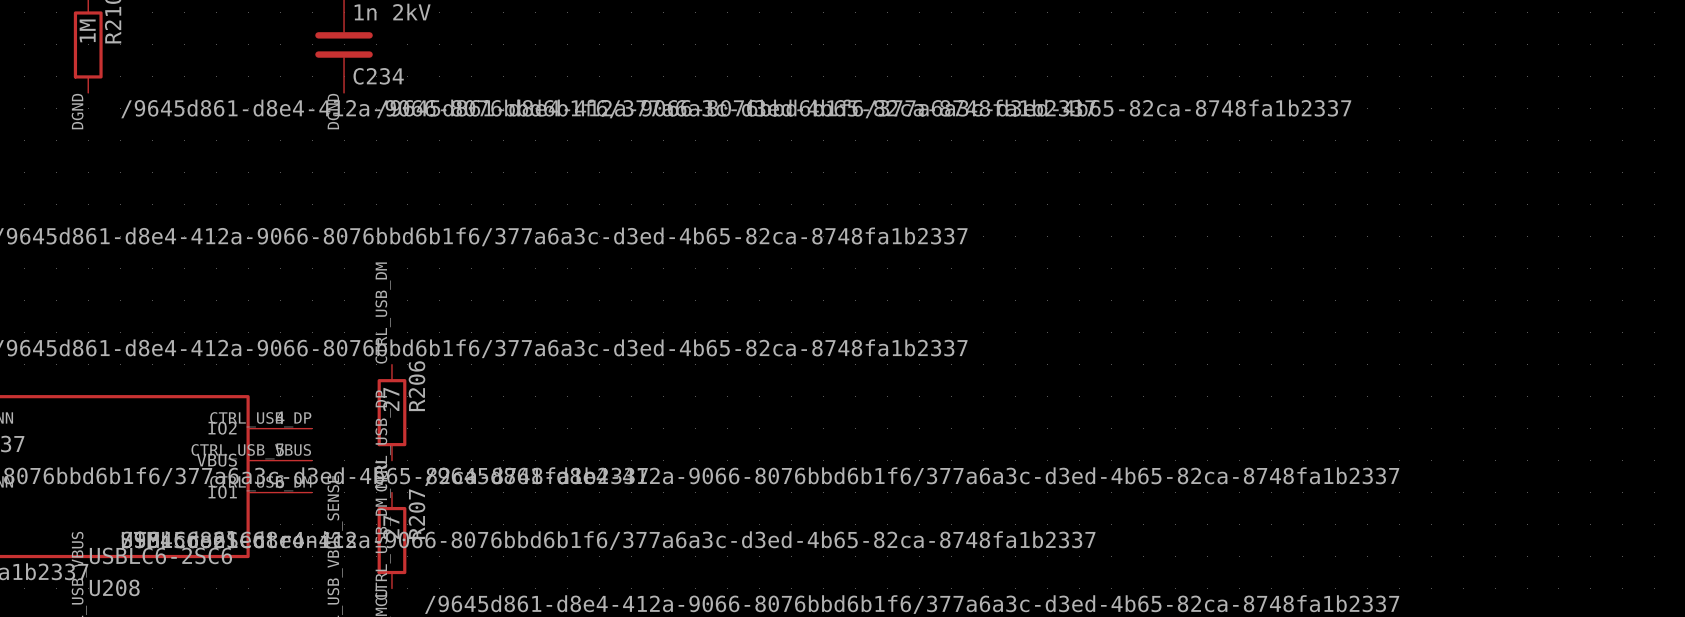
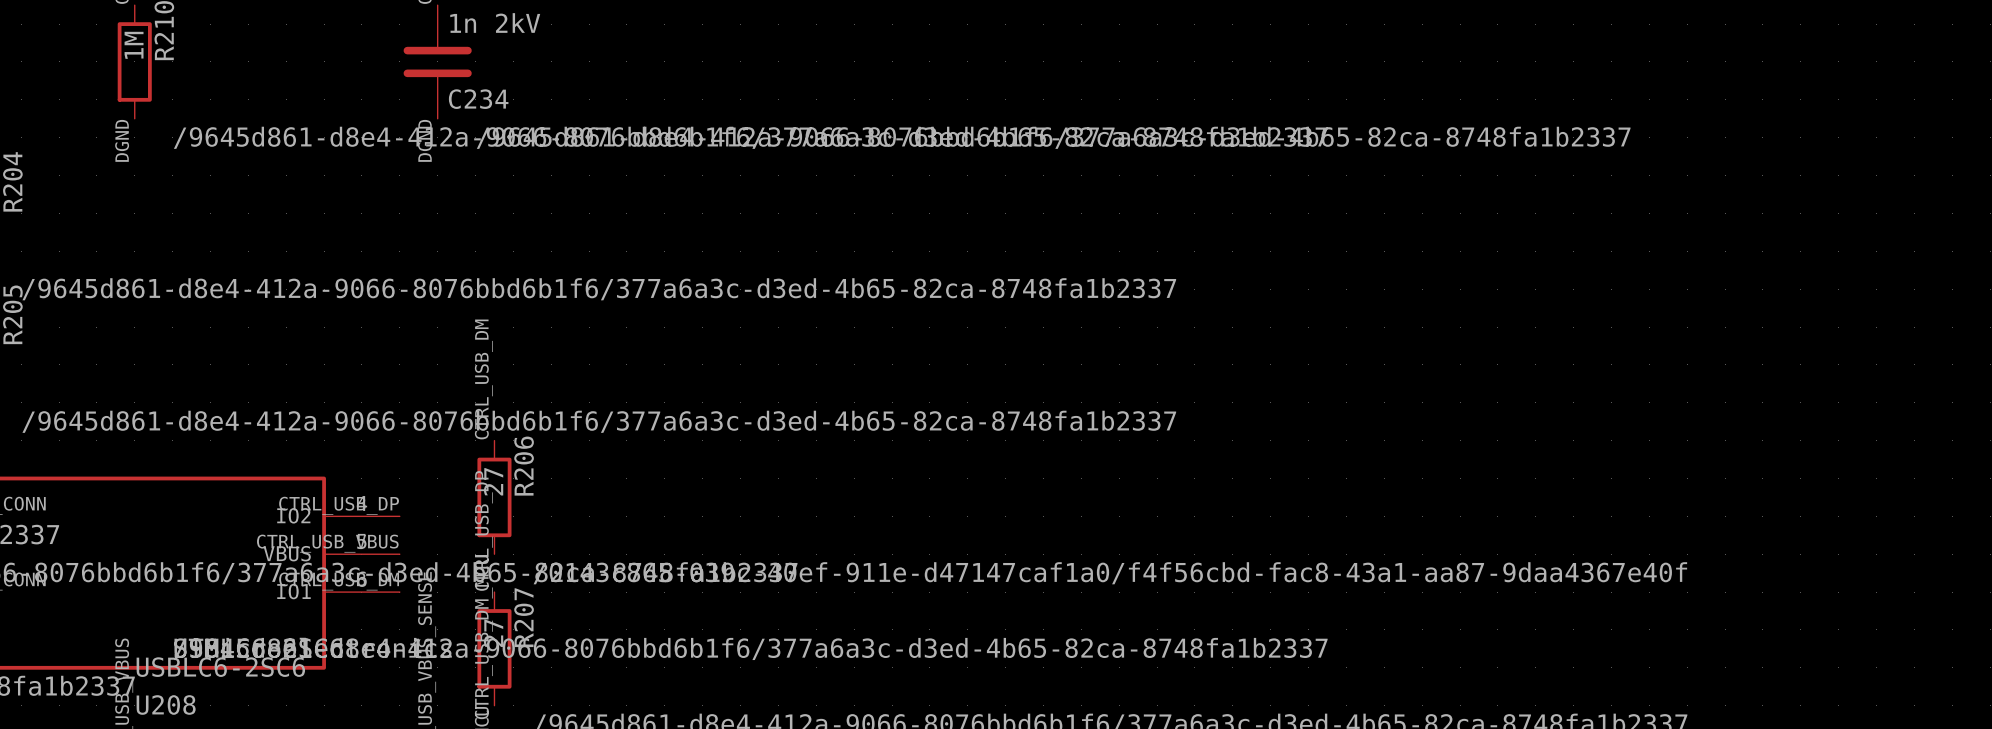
R206 text: /9645d861-d8e4-412a-9066-8076bbd6b1f6/377a6a3c-d3ed-4b65-82ca-8748fa1b2337 (912, 476) -> /0143c865-039c-40ef-911e-d47147caf1a0/f4f56cbd-fac8-43a1-aa87-9daa4367e40f (1110, 573)

